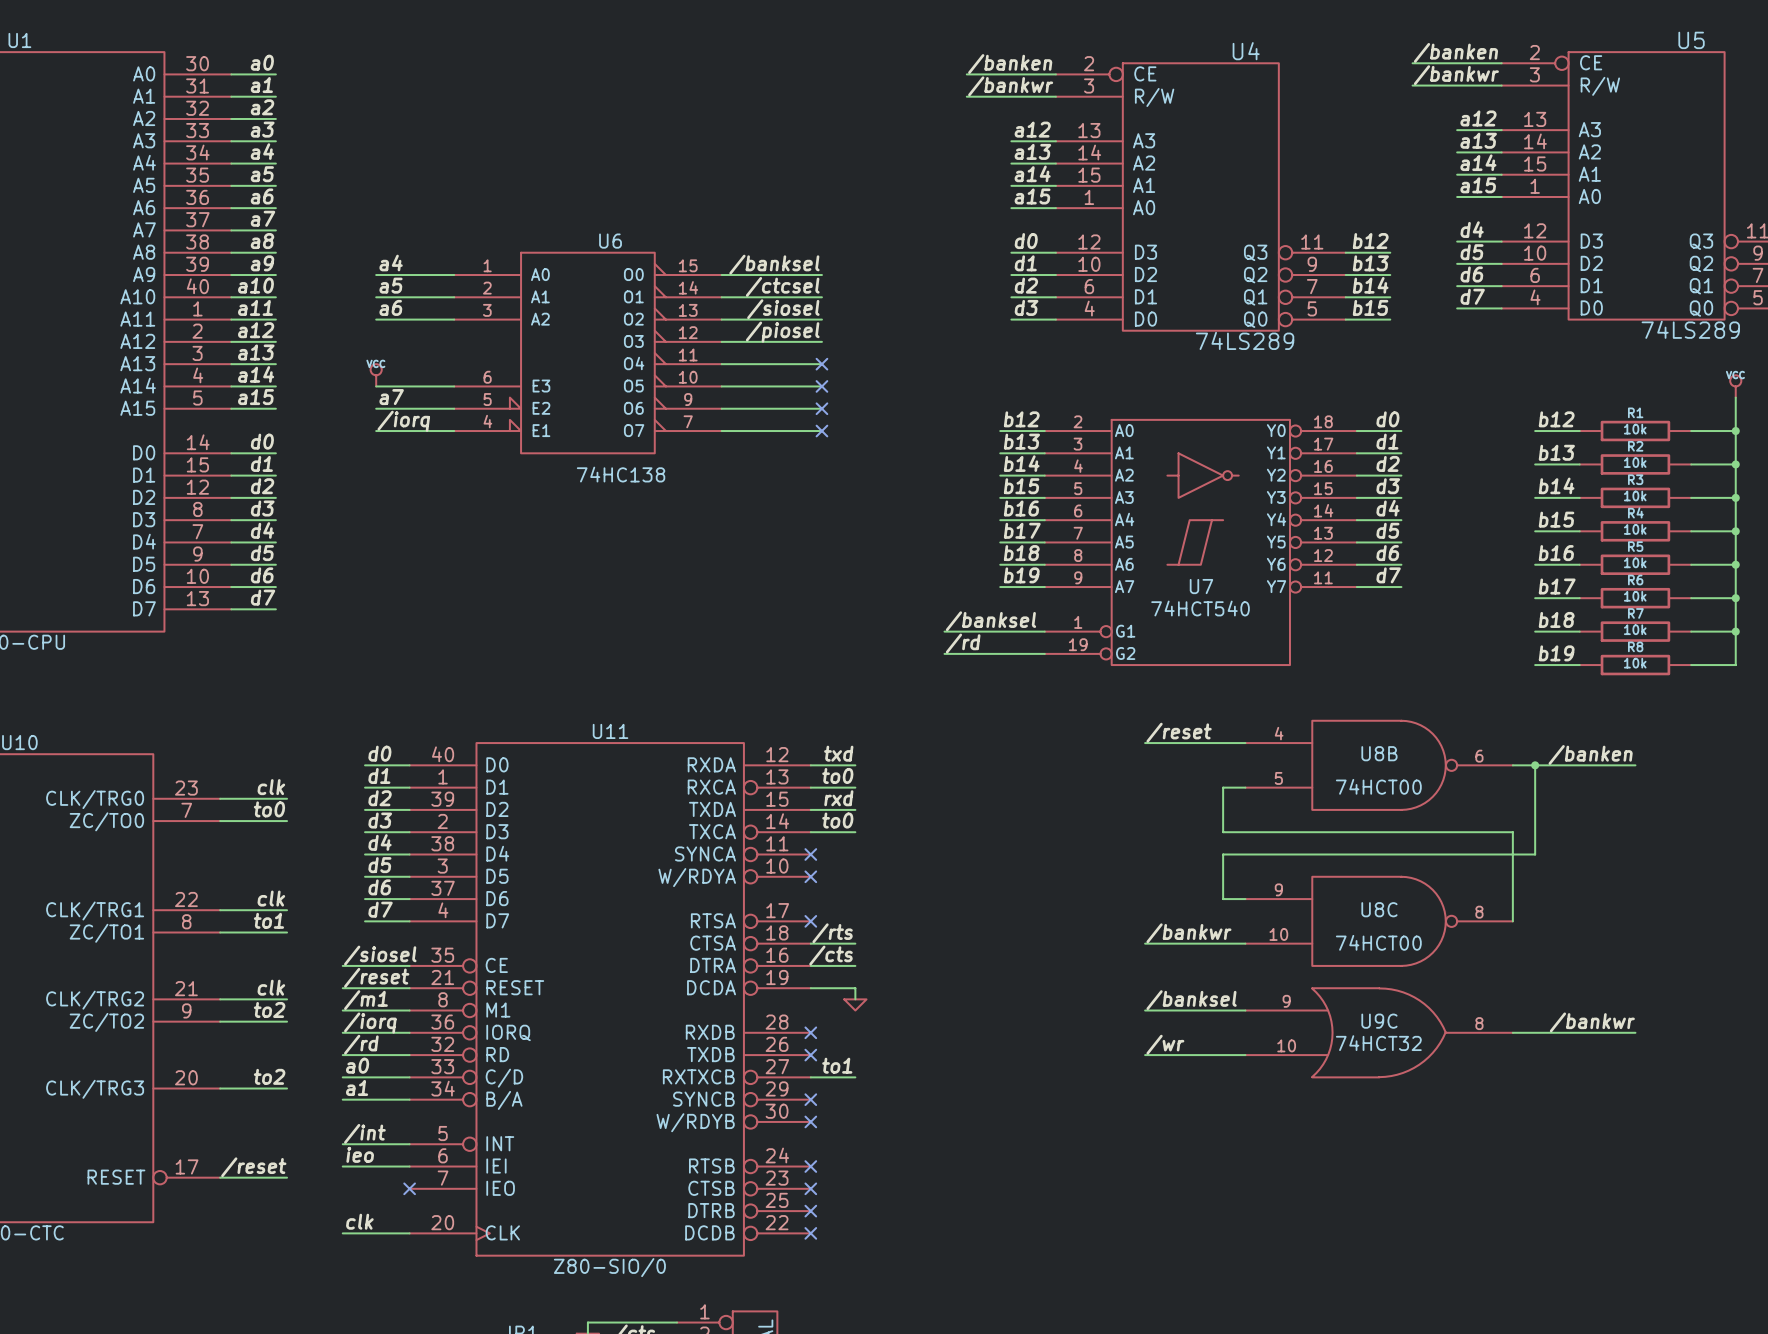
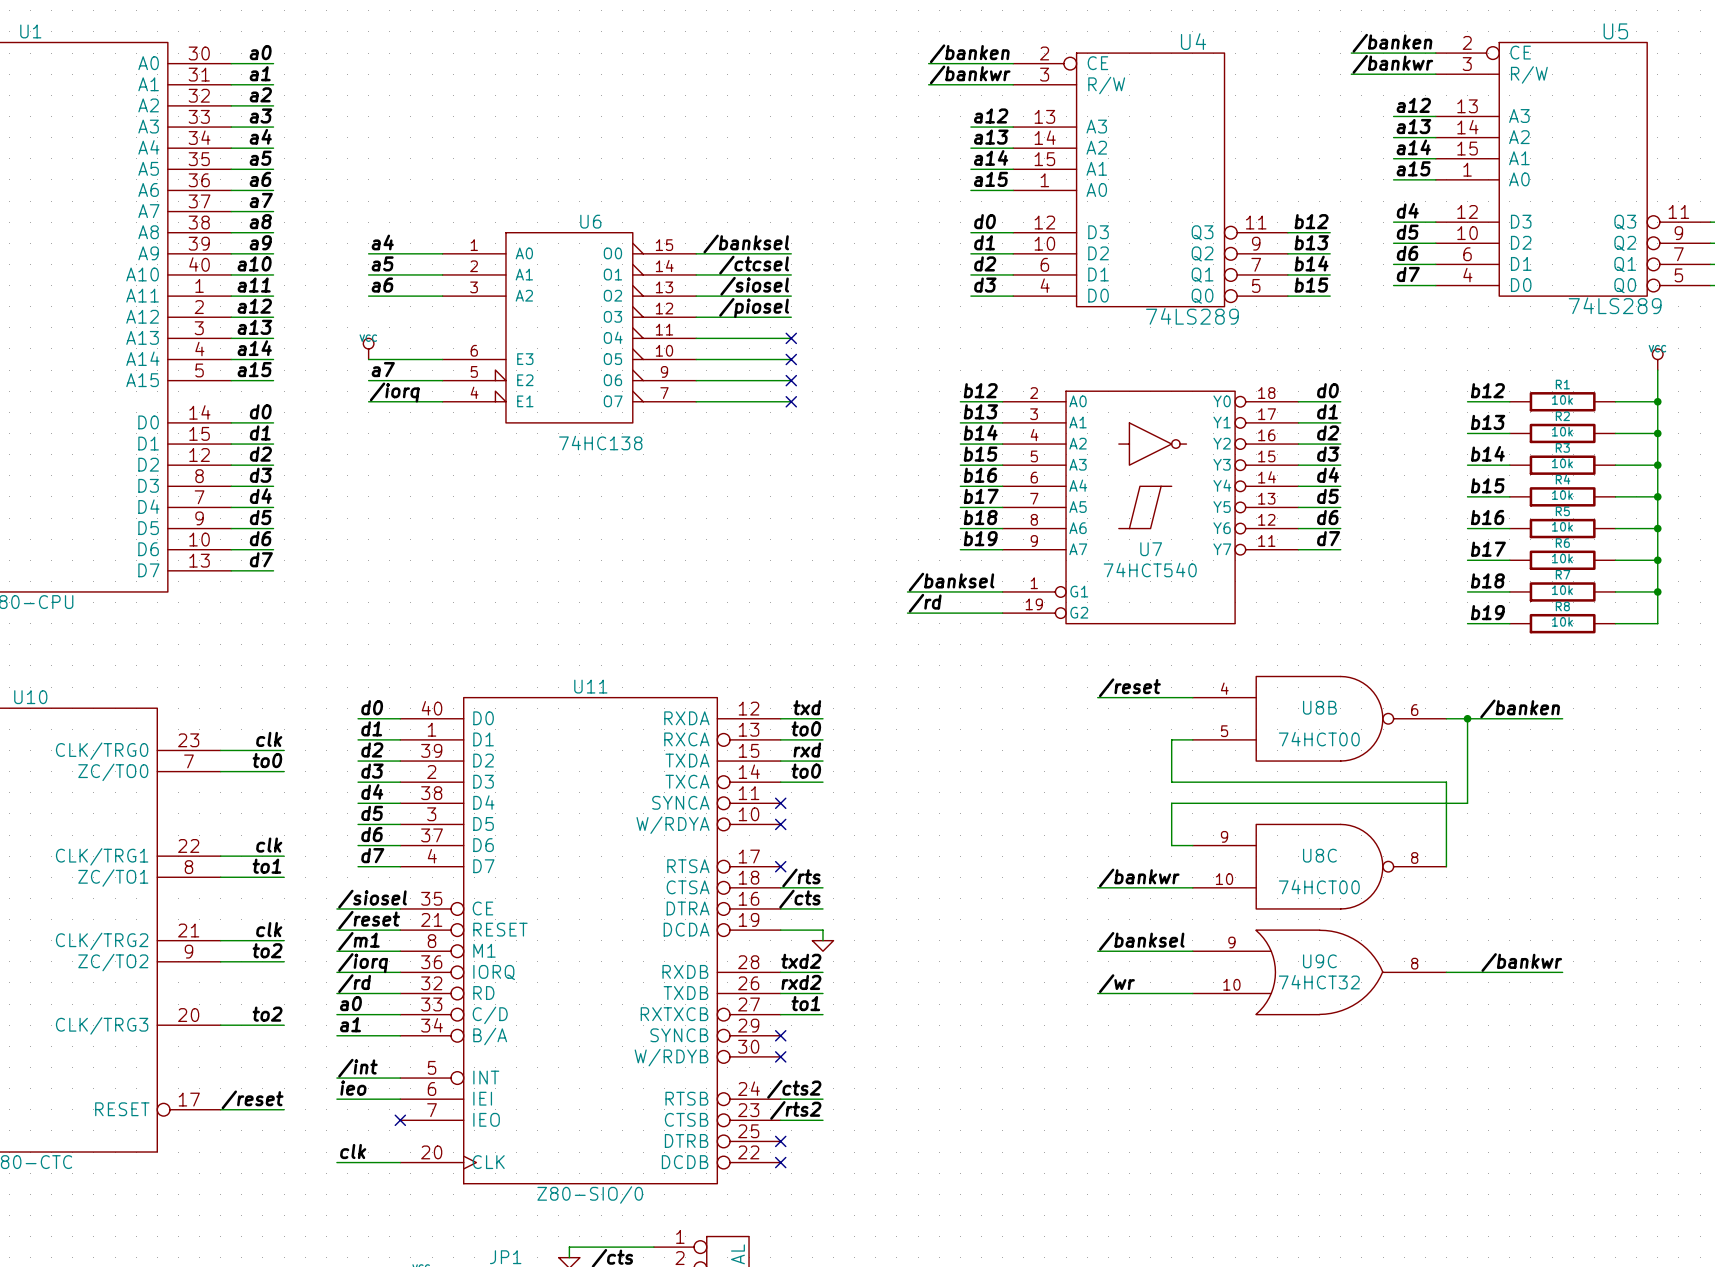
label: none -> txd2 (801, 961)
wire: none -> (780, 972) (822, 972)
no-connect mark: (810, 1032) -> none
label: none -> rxd2 (801, 982)
wire: none -> (780, 993) (822, 993)
no-connect mark: (810, 1055) -> none
label: none -> /cts2 (794, 1089)
wire: none -> (780, 1099) (822, 1099)
no-connect mark: (810, 1166) -> none
label: none -> /rts2 (795, 1110)
wire: none -> (780, 1120) (822, 1120)
no-connect mark: (810, 1188) -> none

